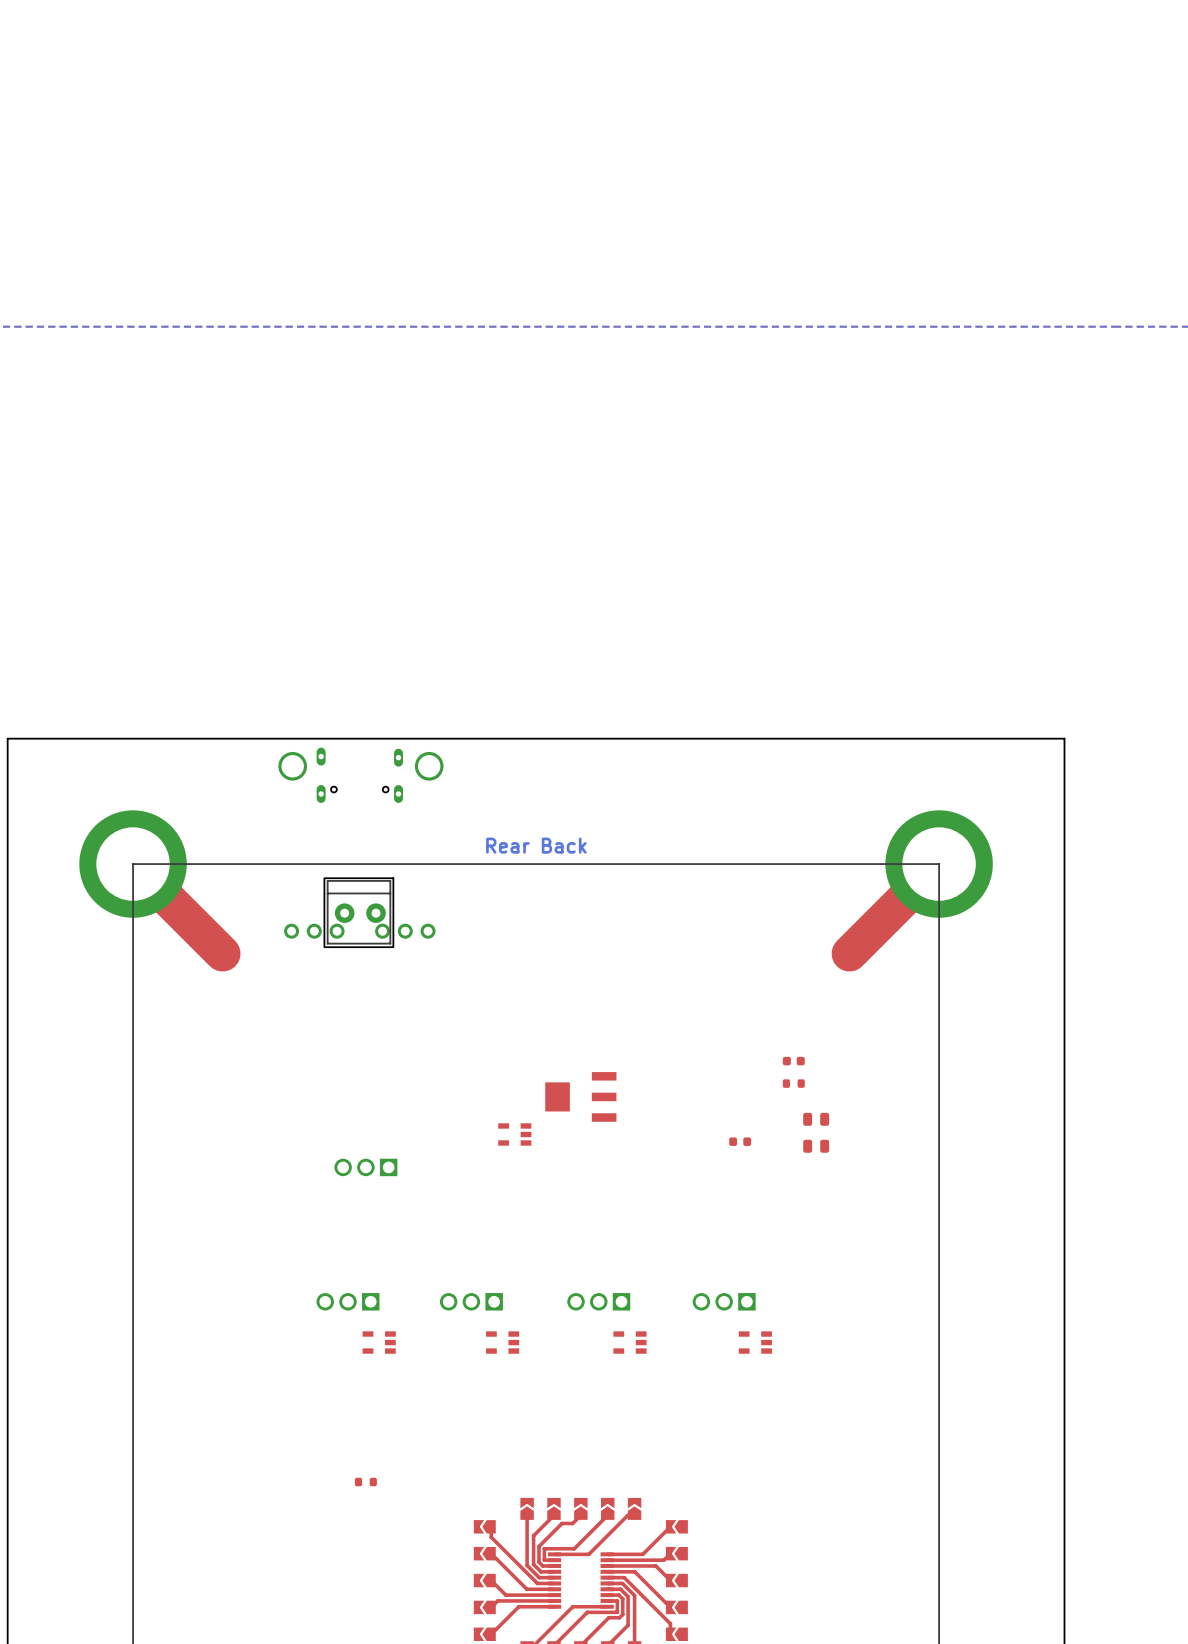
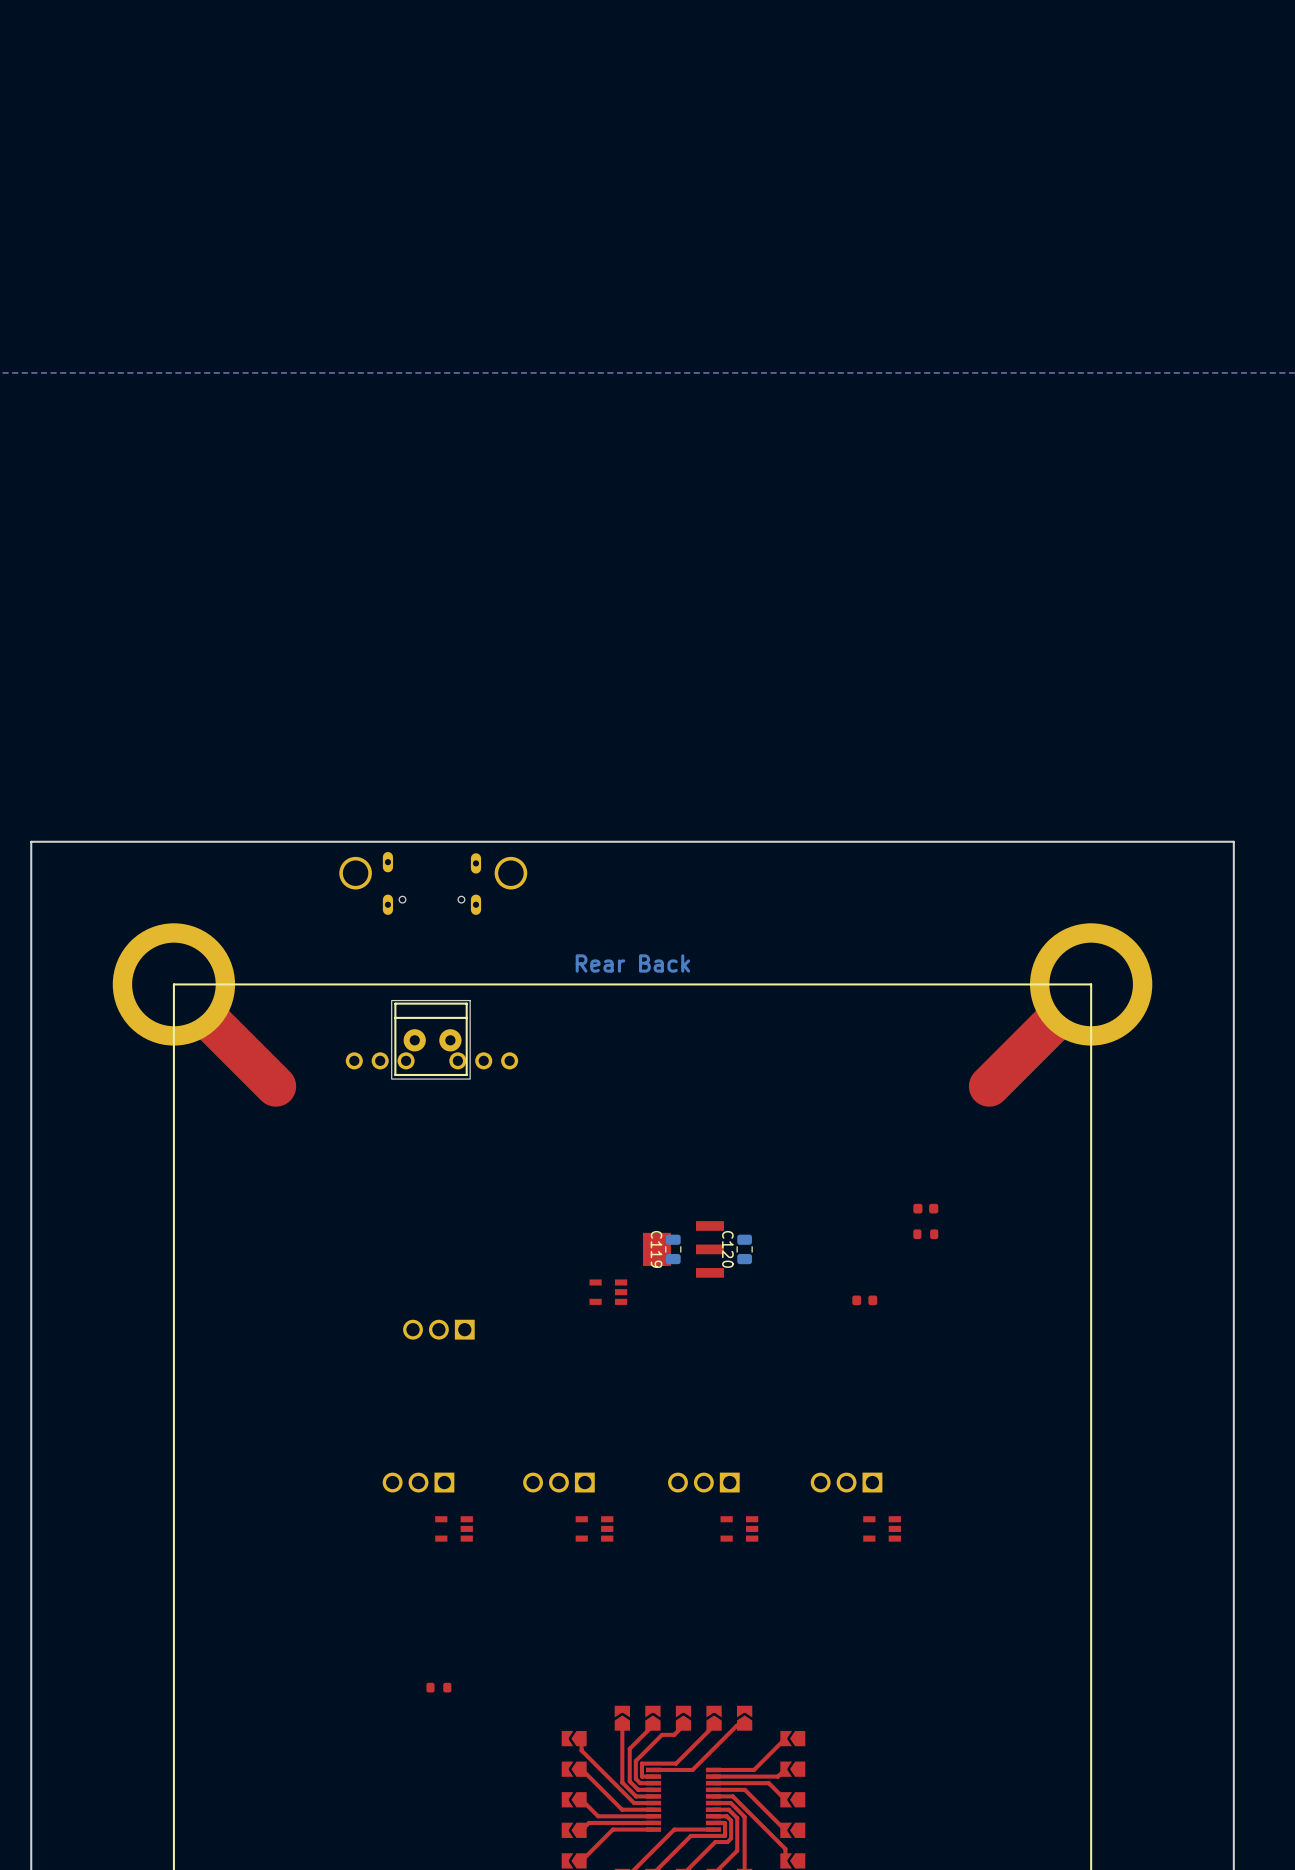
C119: none -> (673, 1249)
part: (816, 1119) -> none
C120 side: top (816, 1146) -> bottom (744, 1249)

